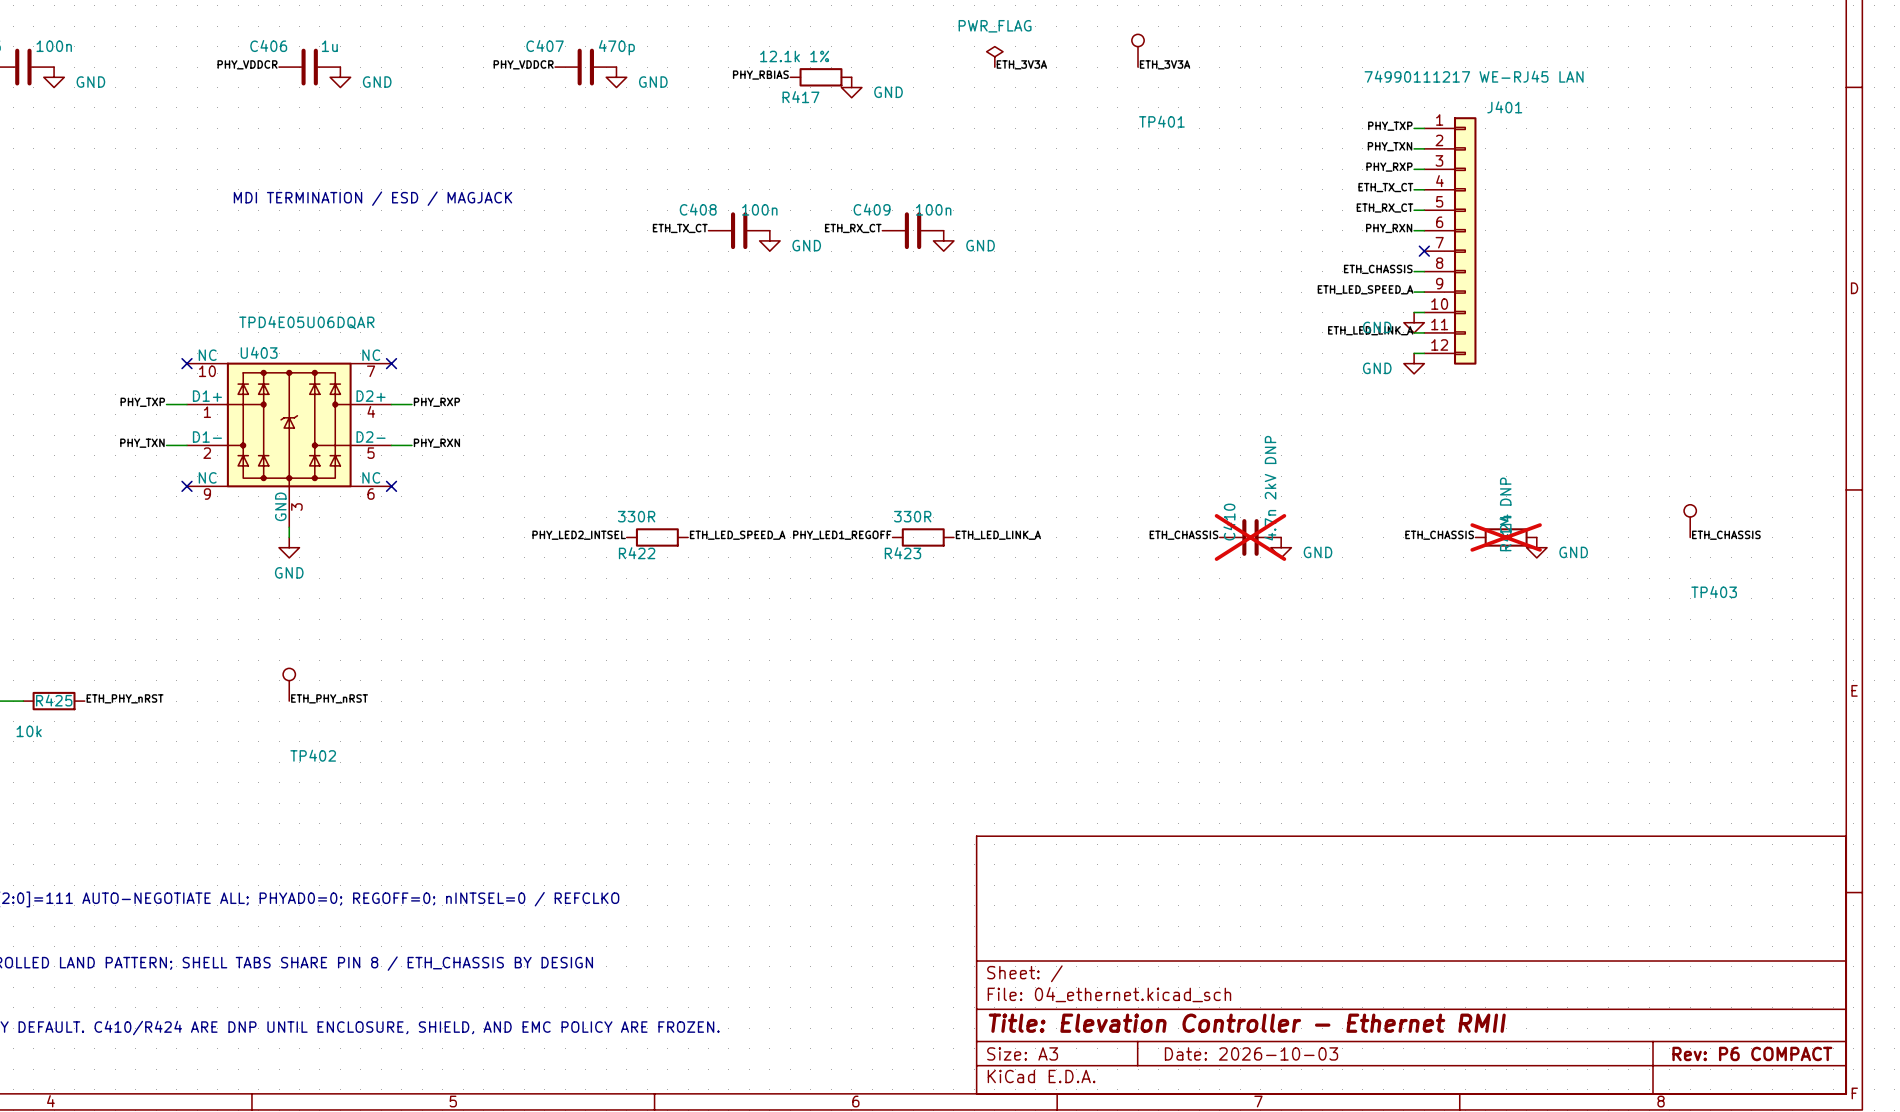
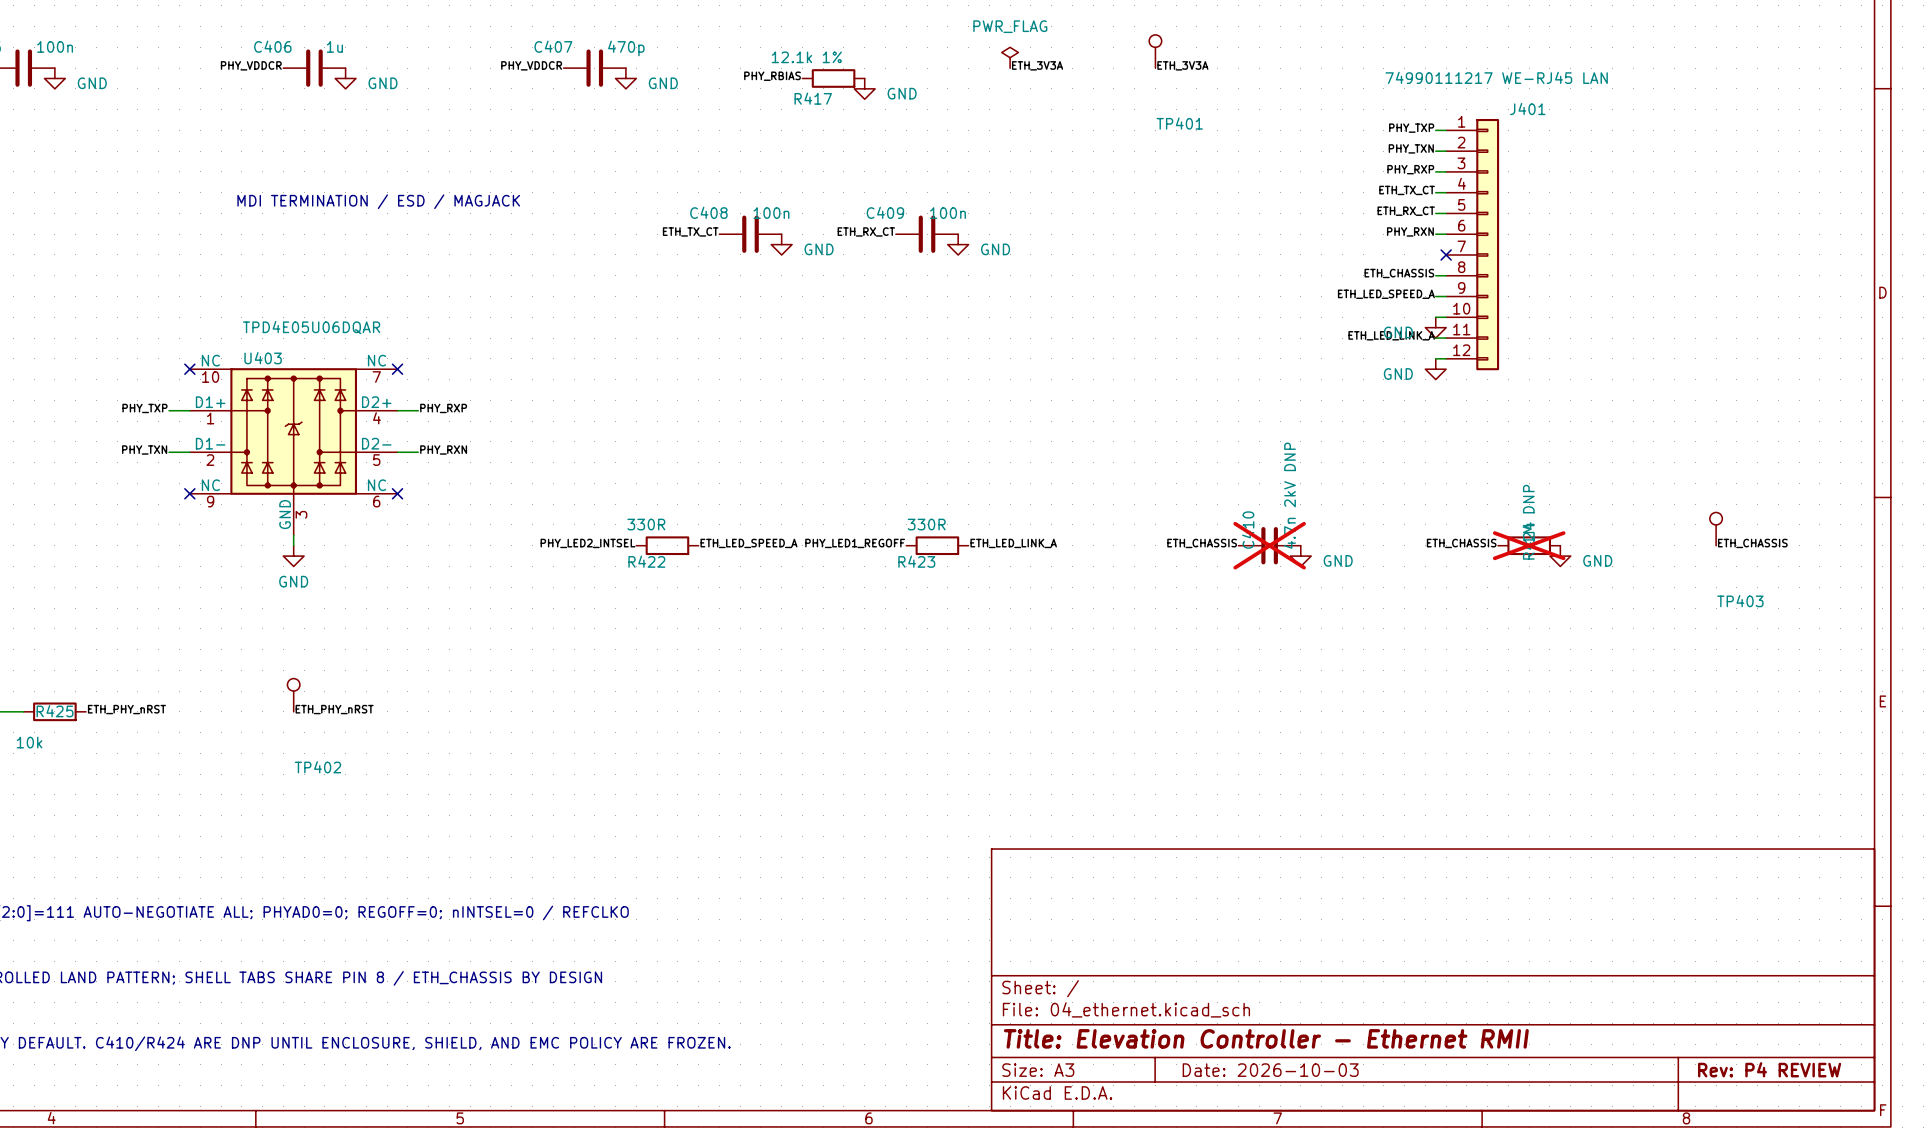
title block: Rev: P6 COMPACT (1752, 1053) -> Rev: P4 REVIEW (1769, 1069)

